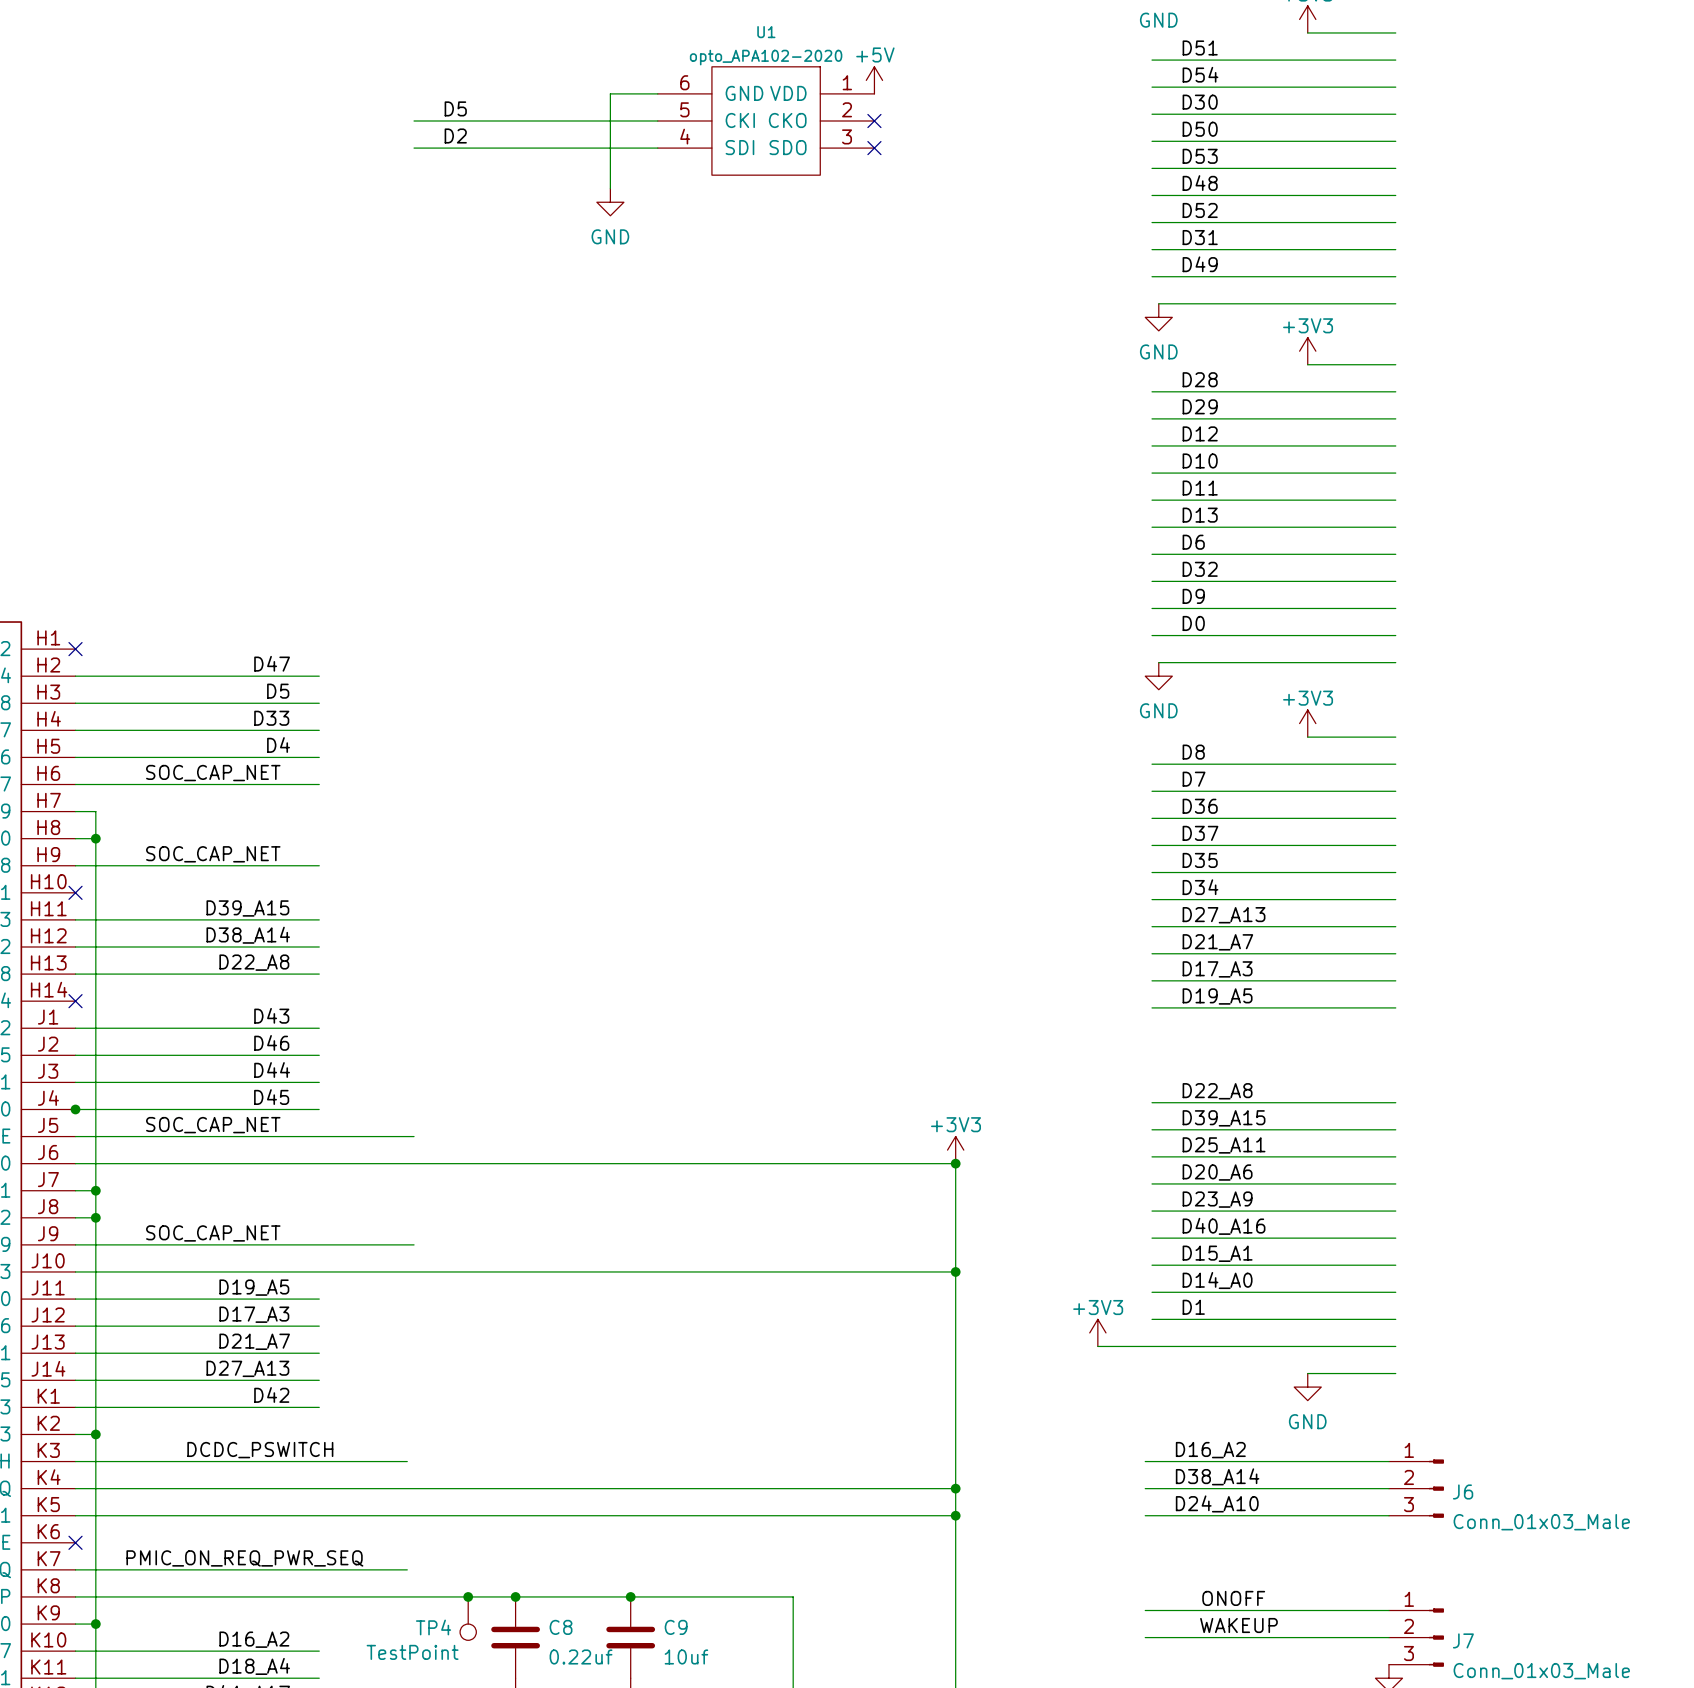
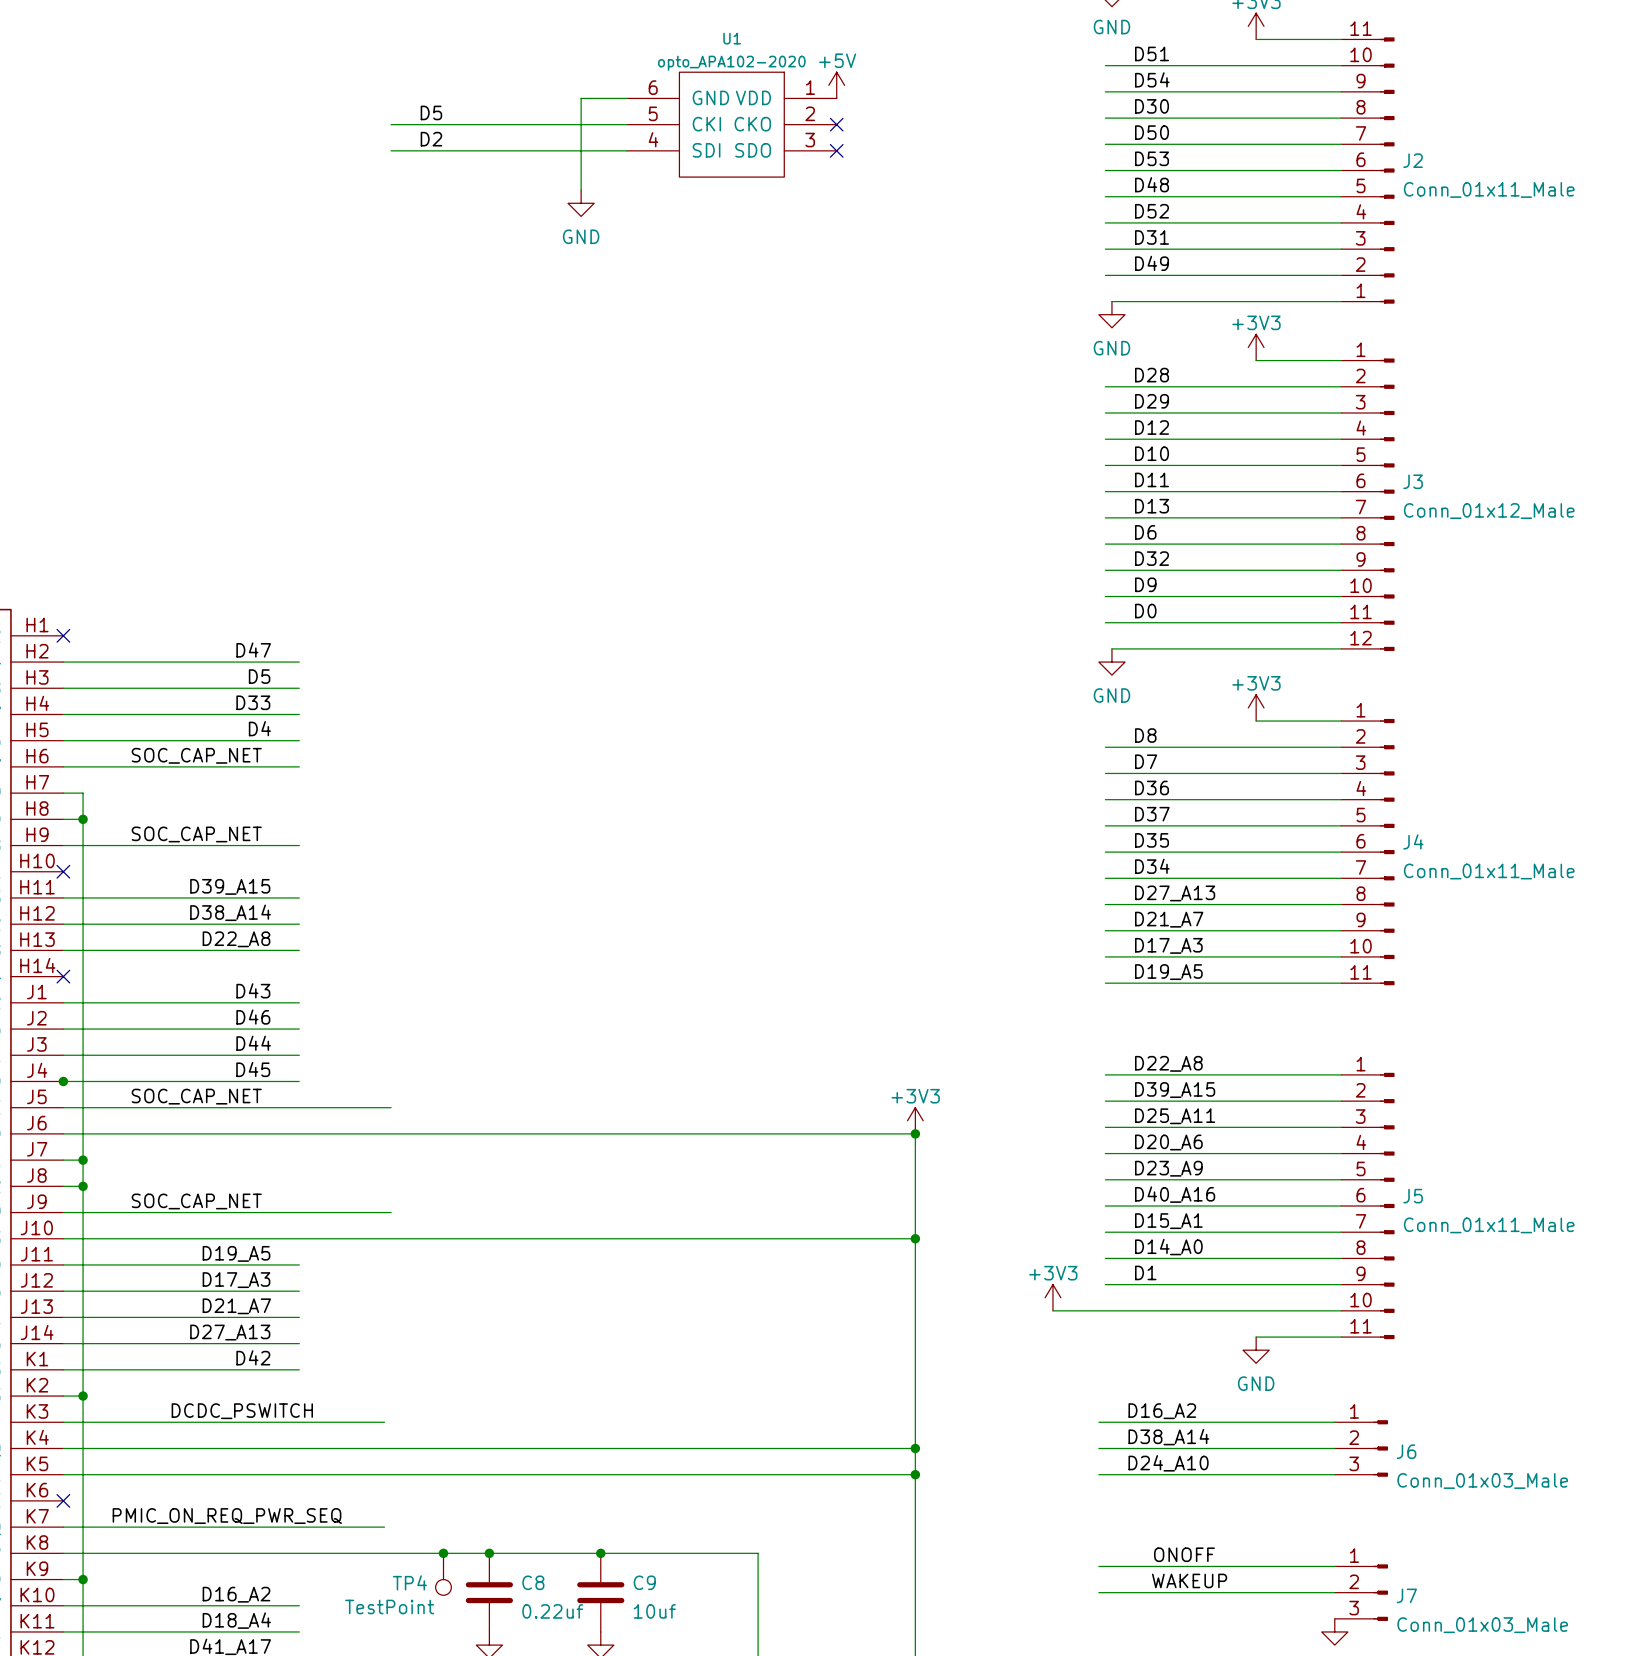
J2: none -> Conn_01x11_Male (1367, 170)
J3: none -> Conn_01x12_Male (1367, 504)
J4: none -> Conn_01x11_Male (1367, 852)
J5: none -> Conn_01x11_Male (1367, 1205)

